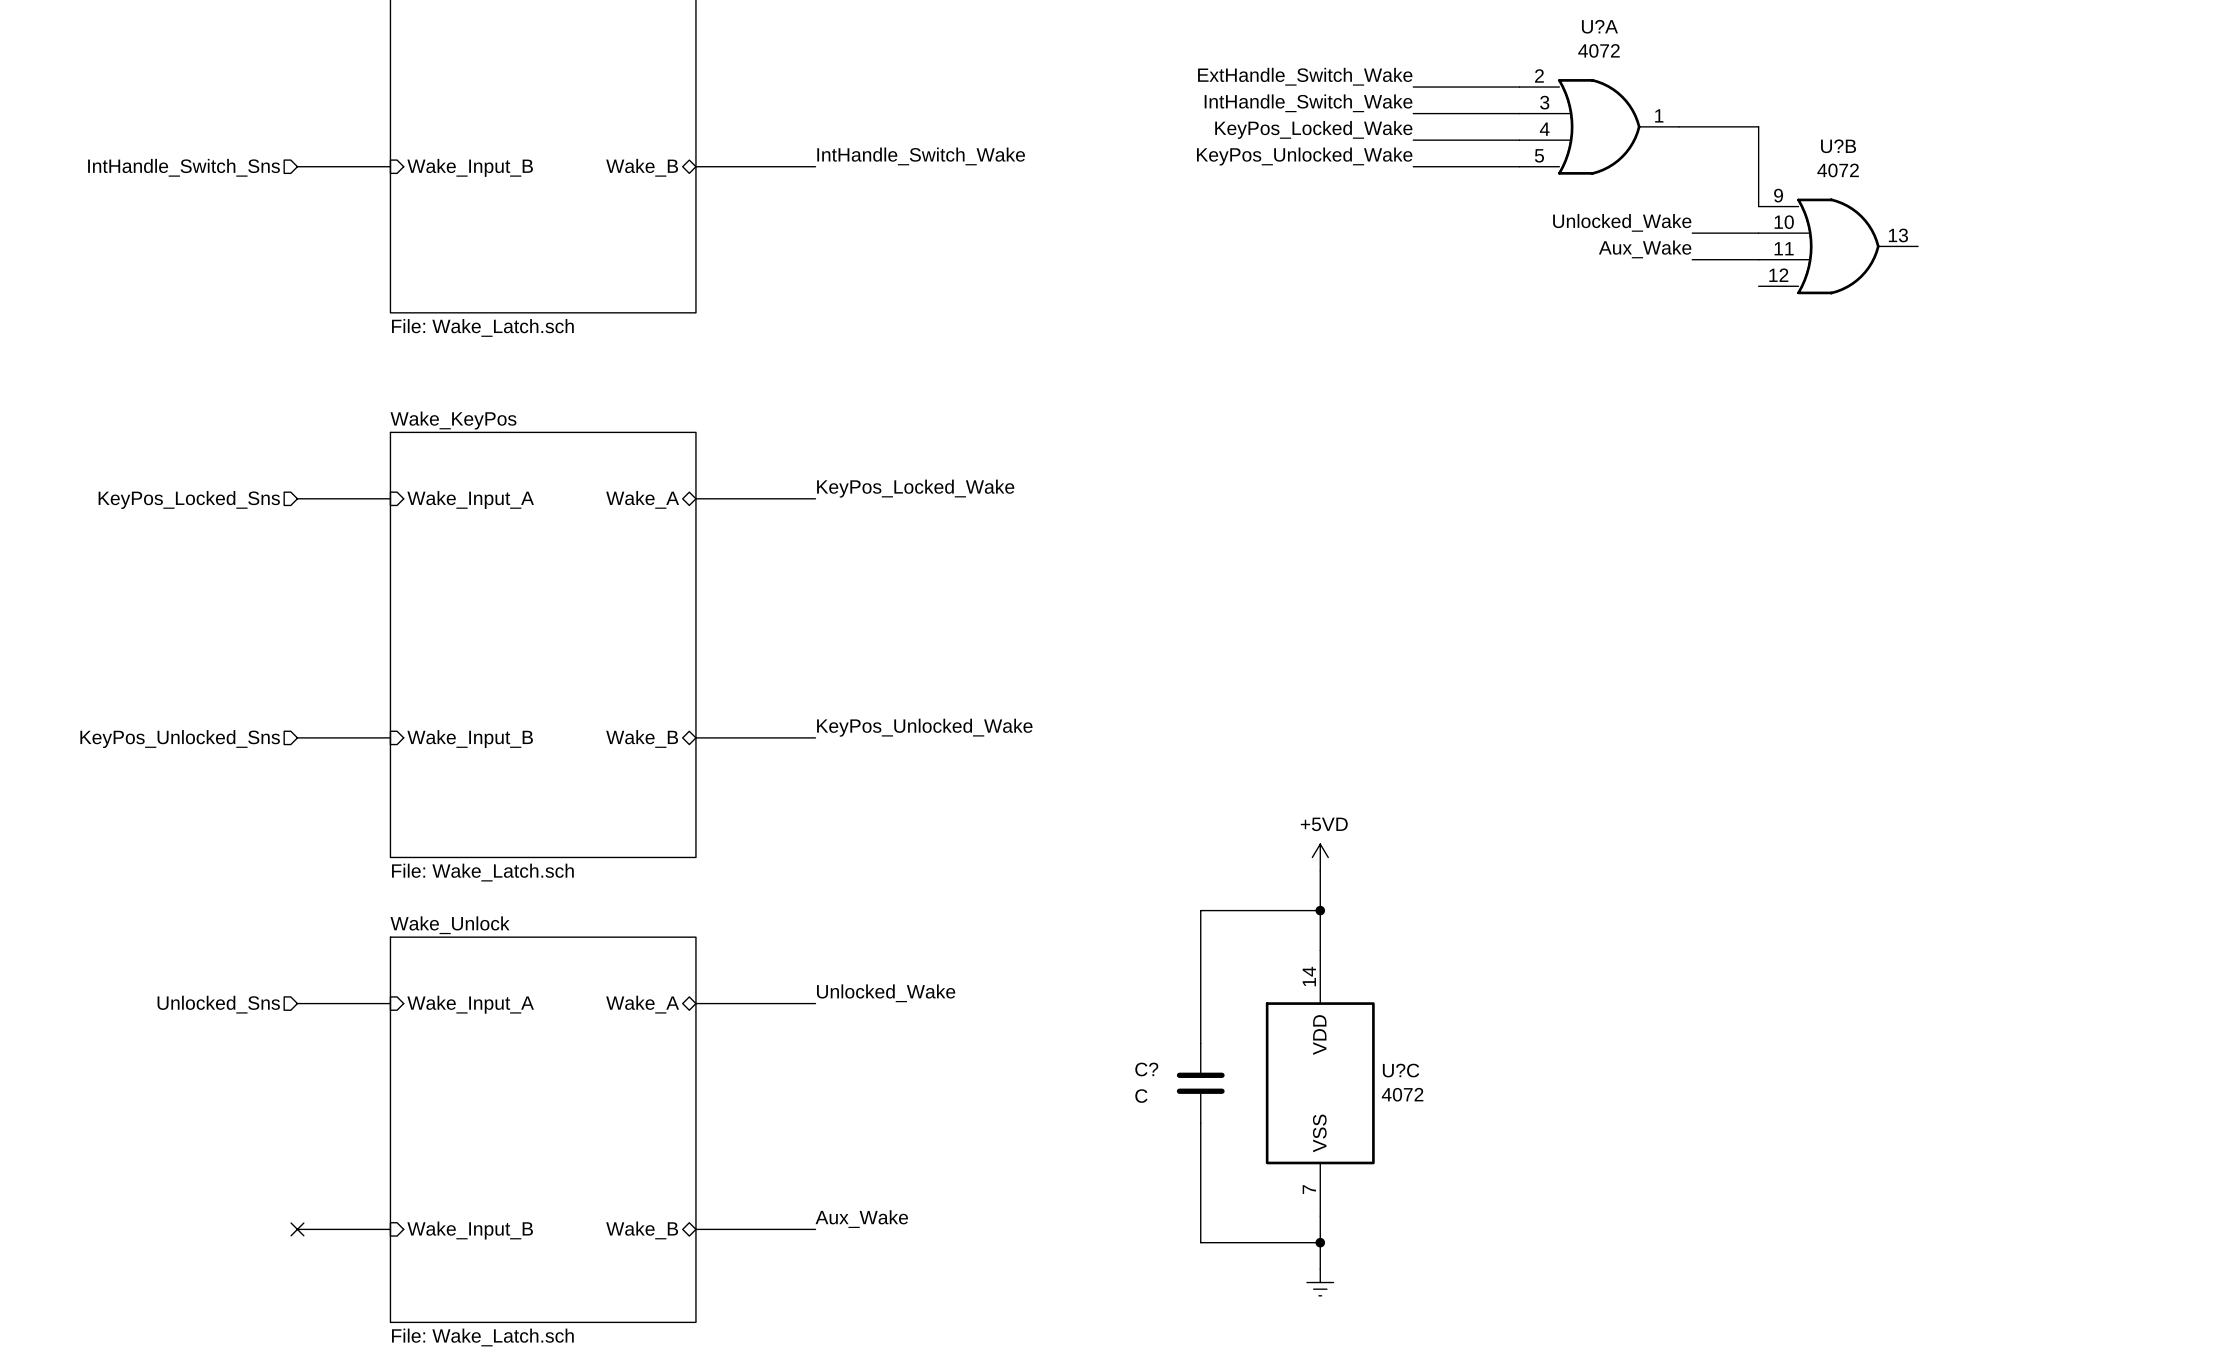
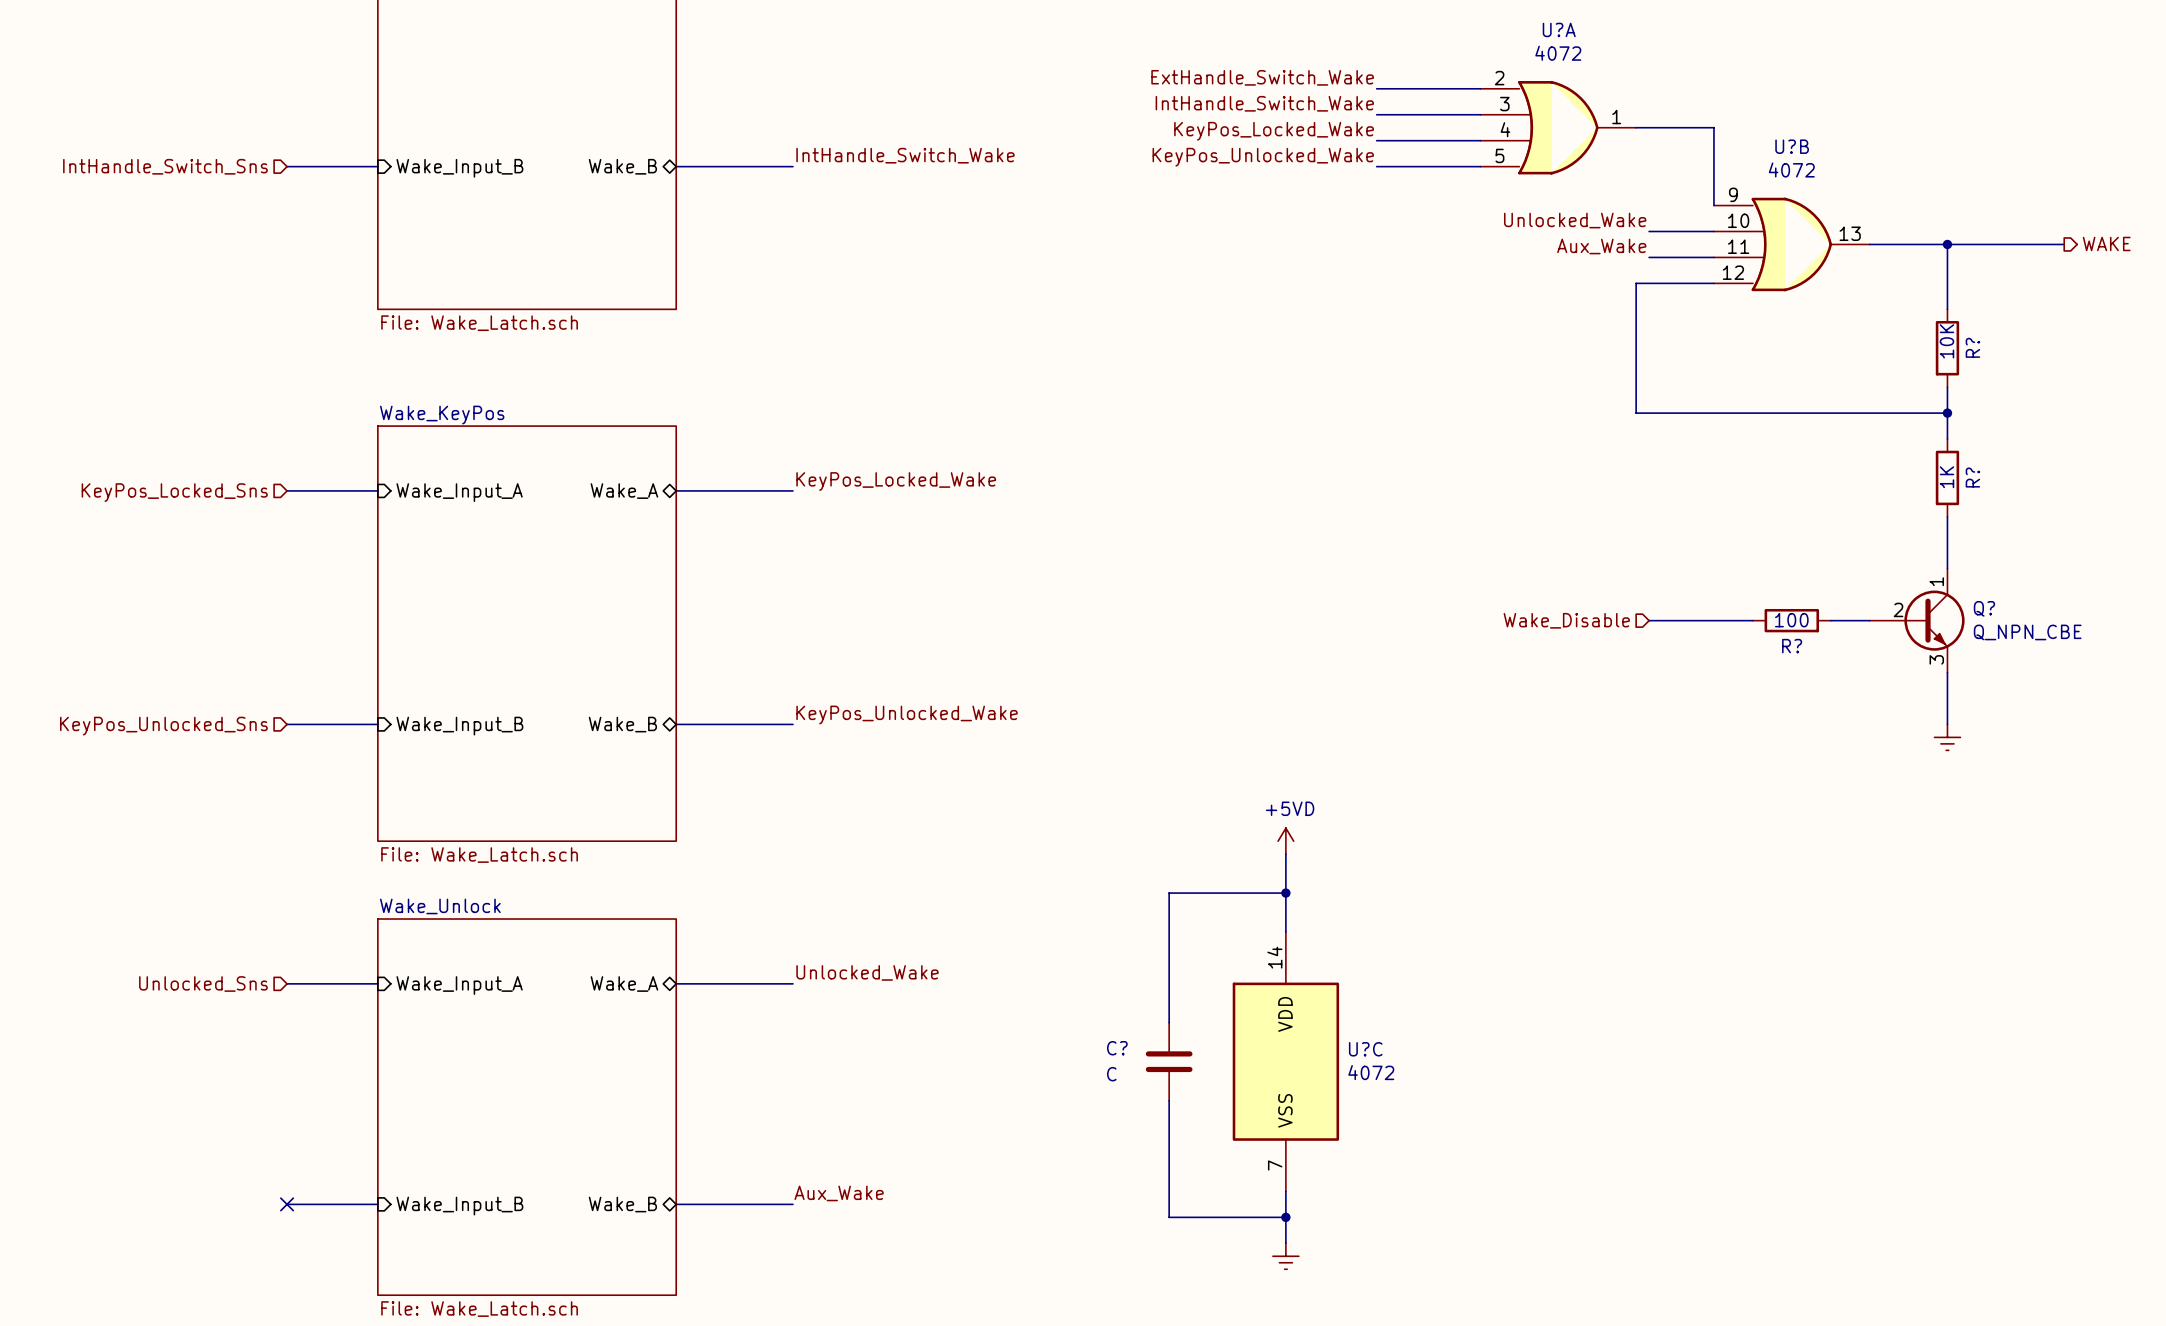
hierarchical label: none -> WAKE (2106, 243)
wire: none -> (1869, 244) (2064, 244)
wire: none -> (1947, 244) (1947, 309)
junction: none -> (1947, 244)
wire: none -> (1713, 283) (1636, 283) (1636, 413) (1947, 413)
R?: none -> 10K (1947, 348)
wire: none -> (1947, 387) (1947, 439)
junction: none -> (1947, 413)
R?: none -> 1K (1947, 477)
wire: none -> (1947, 516) (1947, 568)
wire: none -> (1649, 620) (1752, 620)
R?: none -> 100 (1791, 620)
wire: none -> (1830, 620) (1869, 620)
Q?: none -> Q_NPN_CBE (1917, 620)
hierarchical label: none -> Wake_Disable (1566, 620)
wire: none -> (1947, 672) (1947, 724)
power symbol: none -> (1947, 737)

